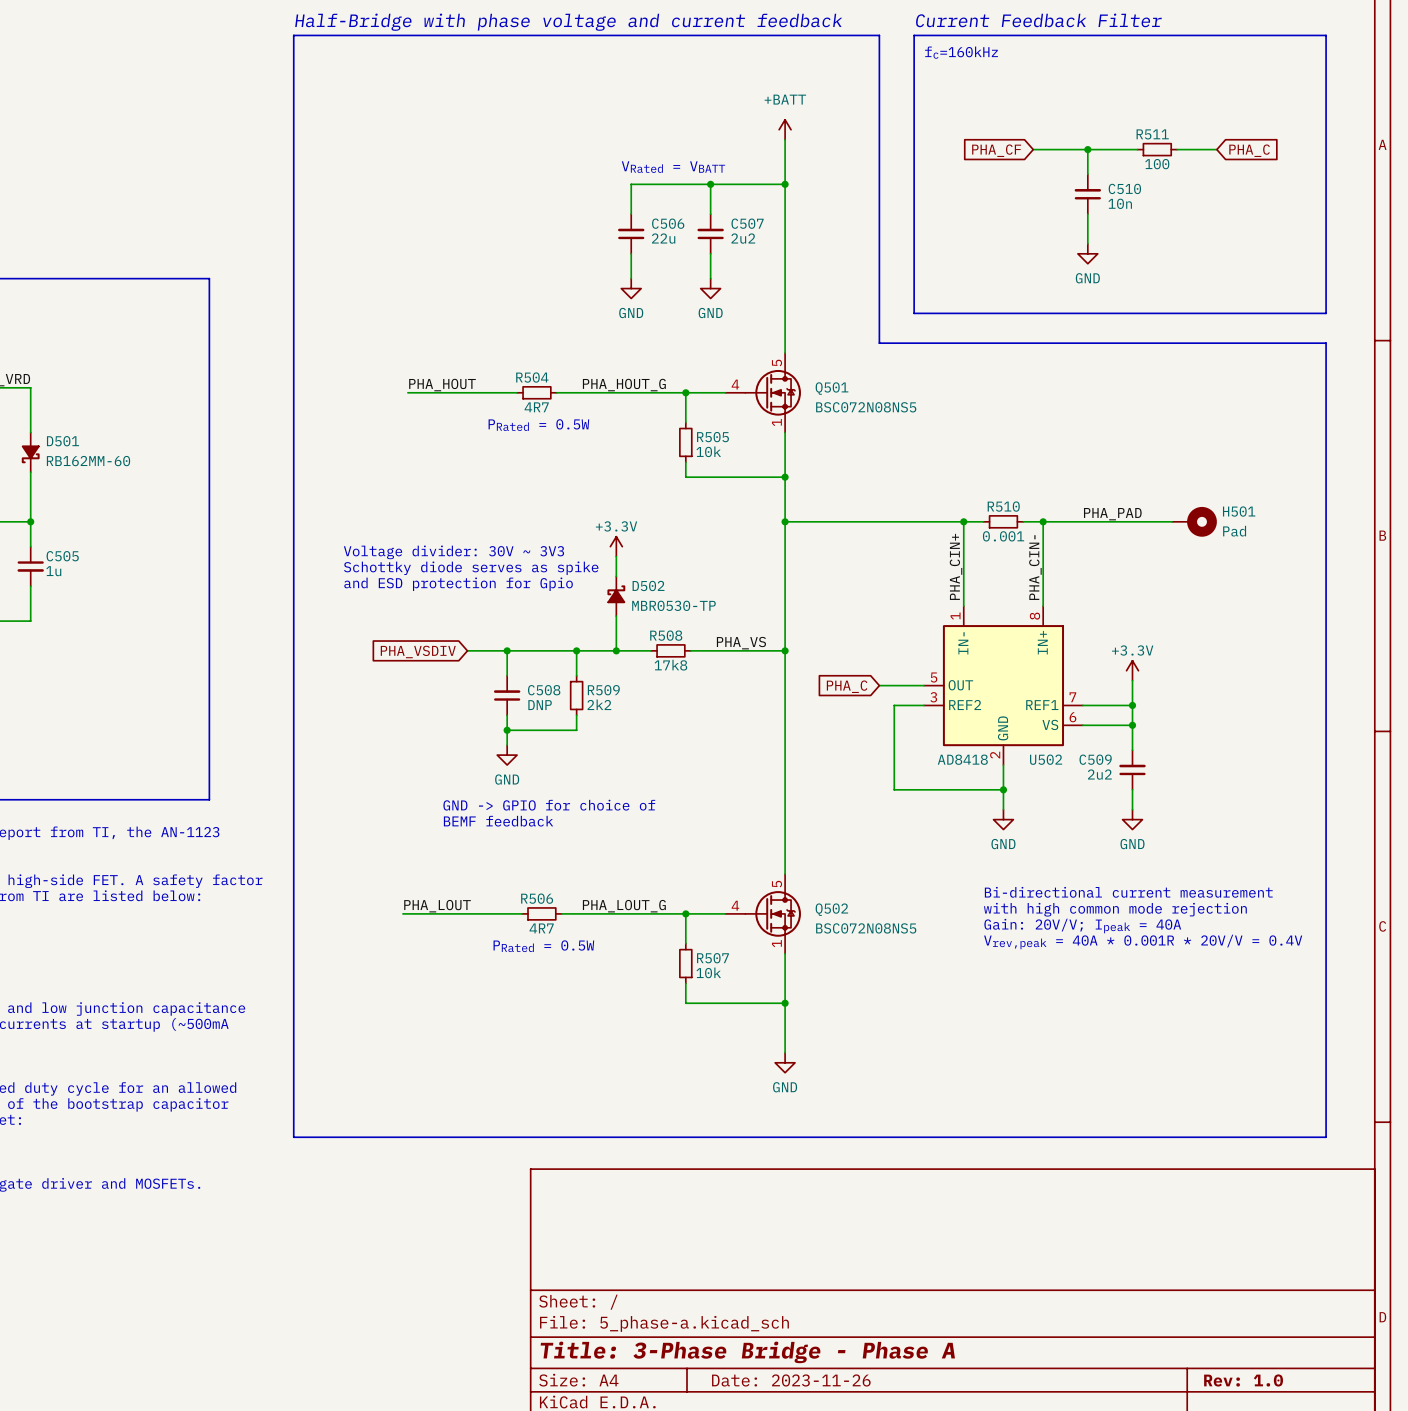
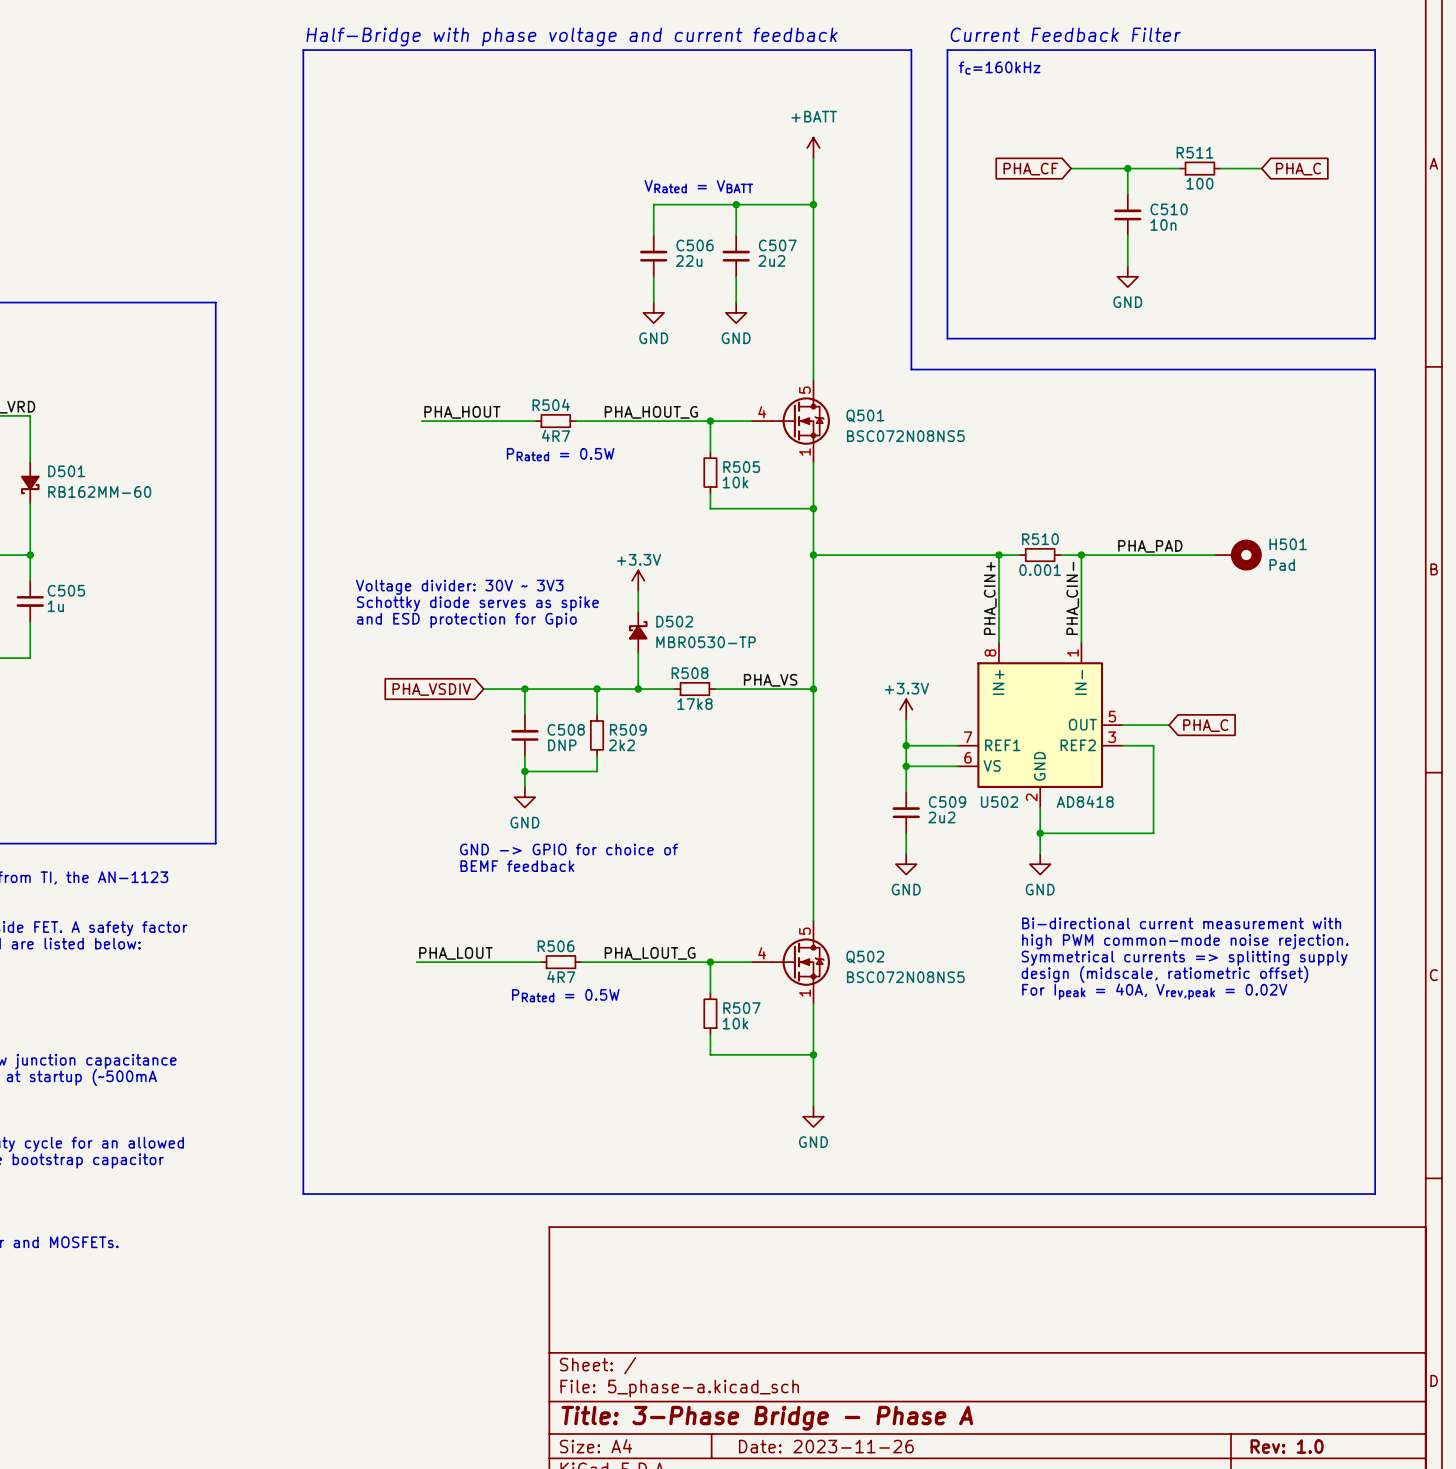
power symbol: none -> +3.3V (906, 709)
power symbol: +3.3V (1132, 670) -> none
wire: none -> (906, 719) (906, 792)
wire: (1132, 680) (1132, 750) -> none
wire: (879, 685) (924, 685) -> none
U502 flip: as is (1003, 685) -> left-right (1040, 725)
wire: none -> (1122, 725) (1169, 725)
global label: PHA_C (847, 686) -> none
global label: none -> PHA_C (1205, 725)
junction: none -> (906, 745)
wire: (894, 705) (894, 789) (1003, 789) -> (926, 745) (906, 745)
wire: (1112, 705) (1132, 705) -> (1153, 745) (1153, 833) (1040, 833)
junction: (1132, 705) -> none
wire: none -> (906, 766) (957, 766)
junction: none -> (906, 766)
wire: (1082, 725) (1132, 725) -> none
junction: (1132, 725) -> none
C509 name position: C509 (1095, 759) -> C509 (947, 802)
C509 position: (1132, 769) -> (906, 812)
C509 value position: 2u2 (1099, 774) -> 2u2 (941, 817)
wire: none -> (906, 833) (906, 853)
wire: (1132, 789) (1132, 809) -> none
power symbol: none -> GND (906, 864)
power symbol: GND (1132, 819) -> none
text: none -> Bi-directional current measurement with (1181, 923)
text: Bi-directional current measurement (1128, 892) -> high PWM common-mode noise rejection. (1185, 941)
text: with high common mode rejection (1115, 909) -> Symmetrical currents => splitting supply (1184, 958)
text: Gain: 20V/V; Ipeak = 40A (1082, 925) -> design (midscale, ratiometric offset) (1164, 974)
text: Vrev,peak = 40A * 0.001R * 20V/V = 0.4V (1143, 941) -> For Ipeak = 40A, Vrev,peak = 0.02V (1154, 991)

